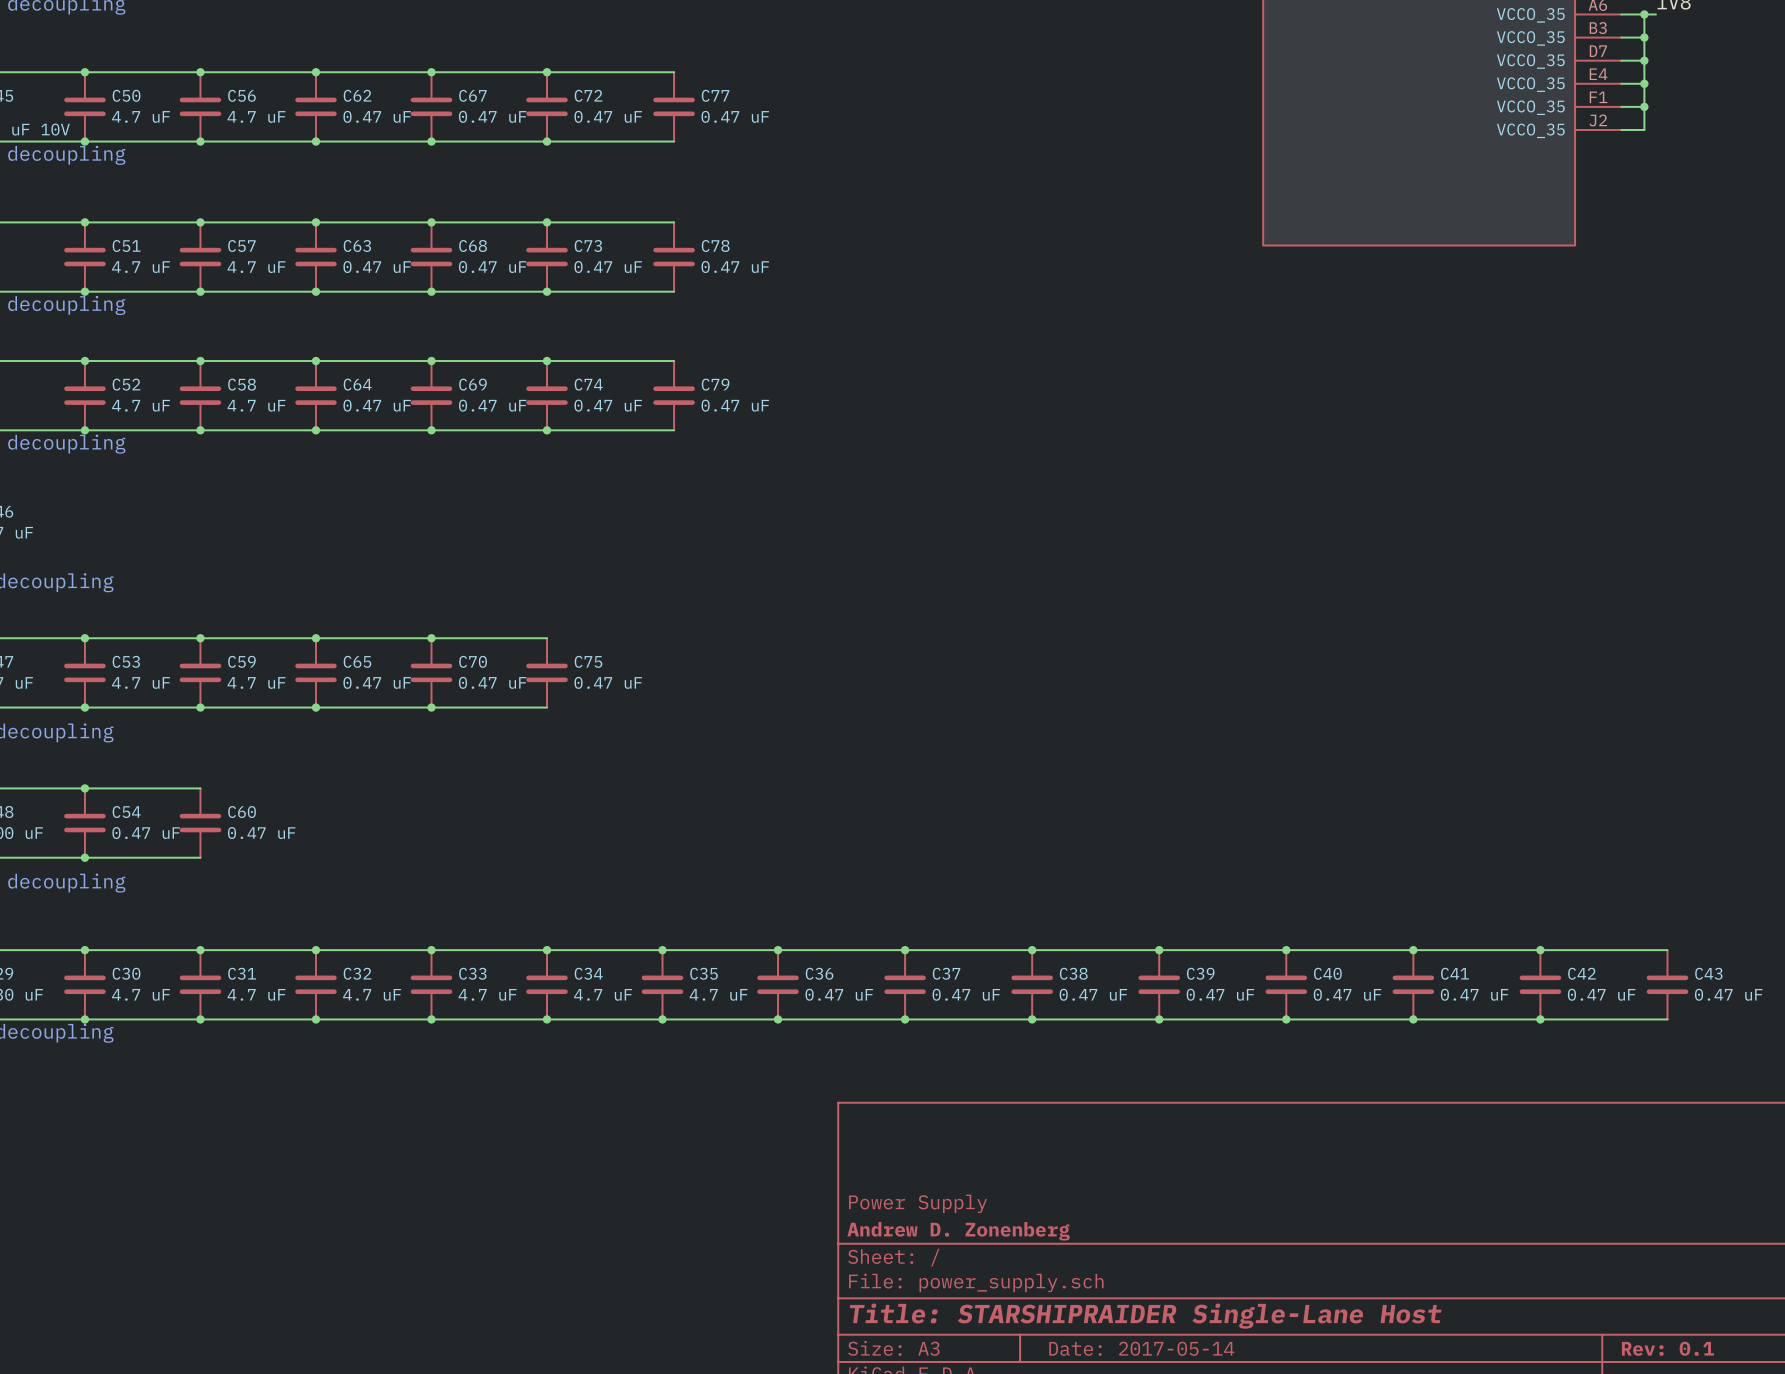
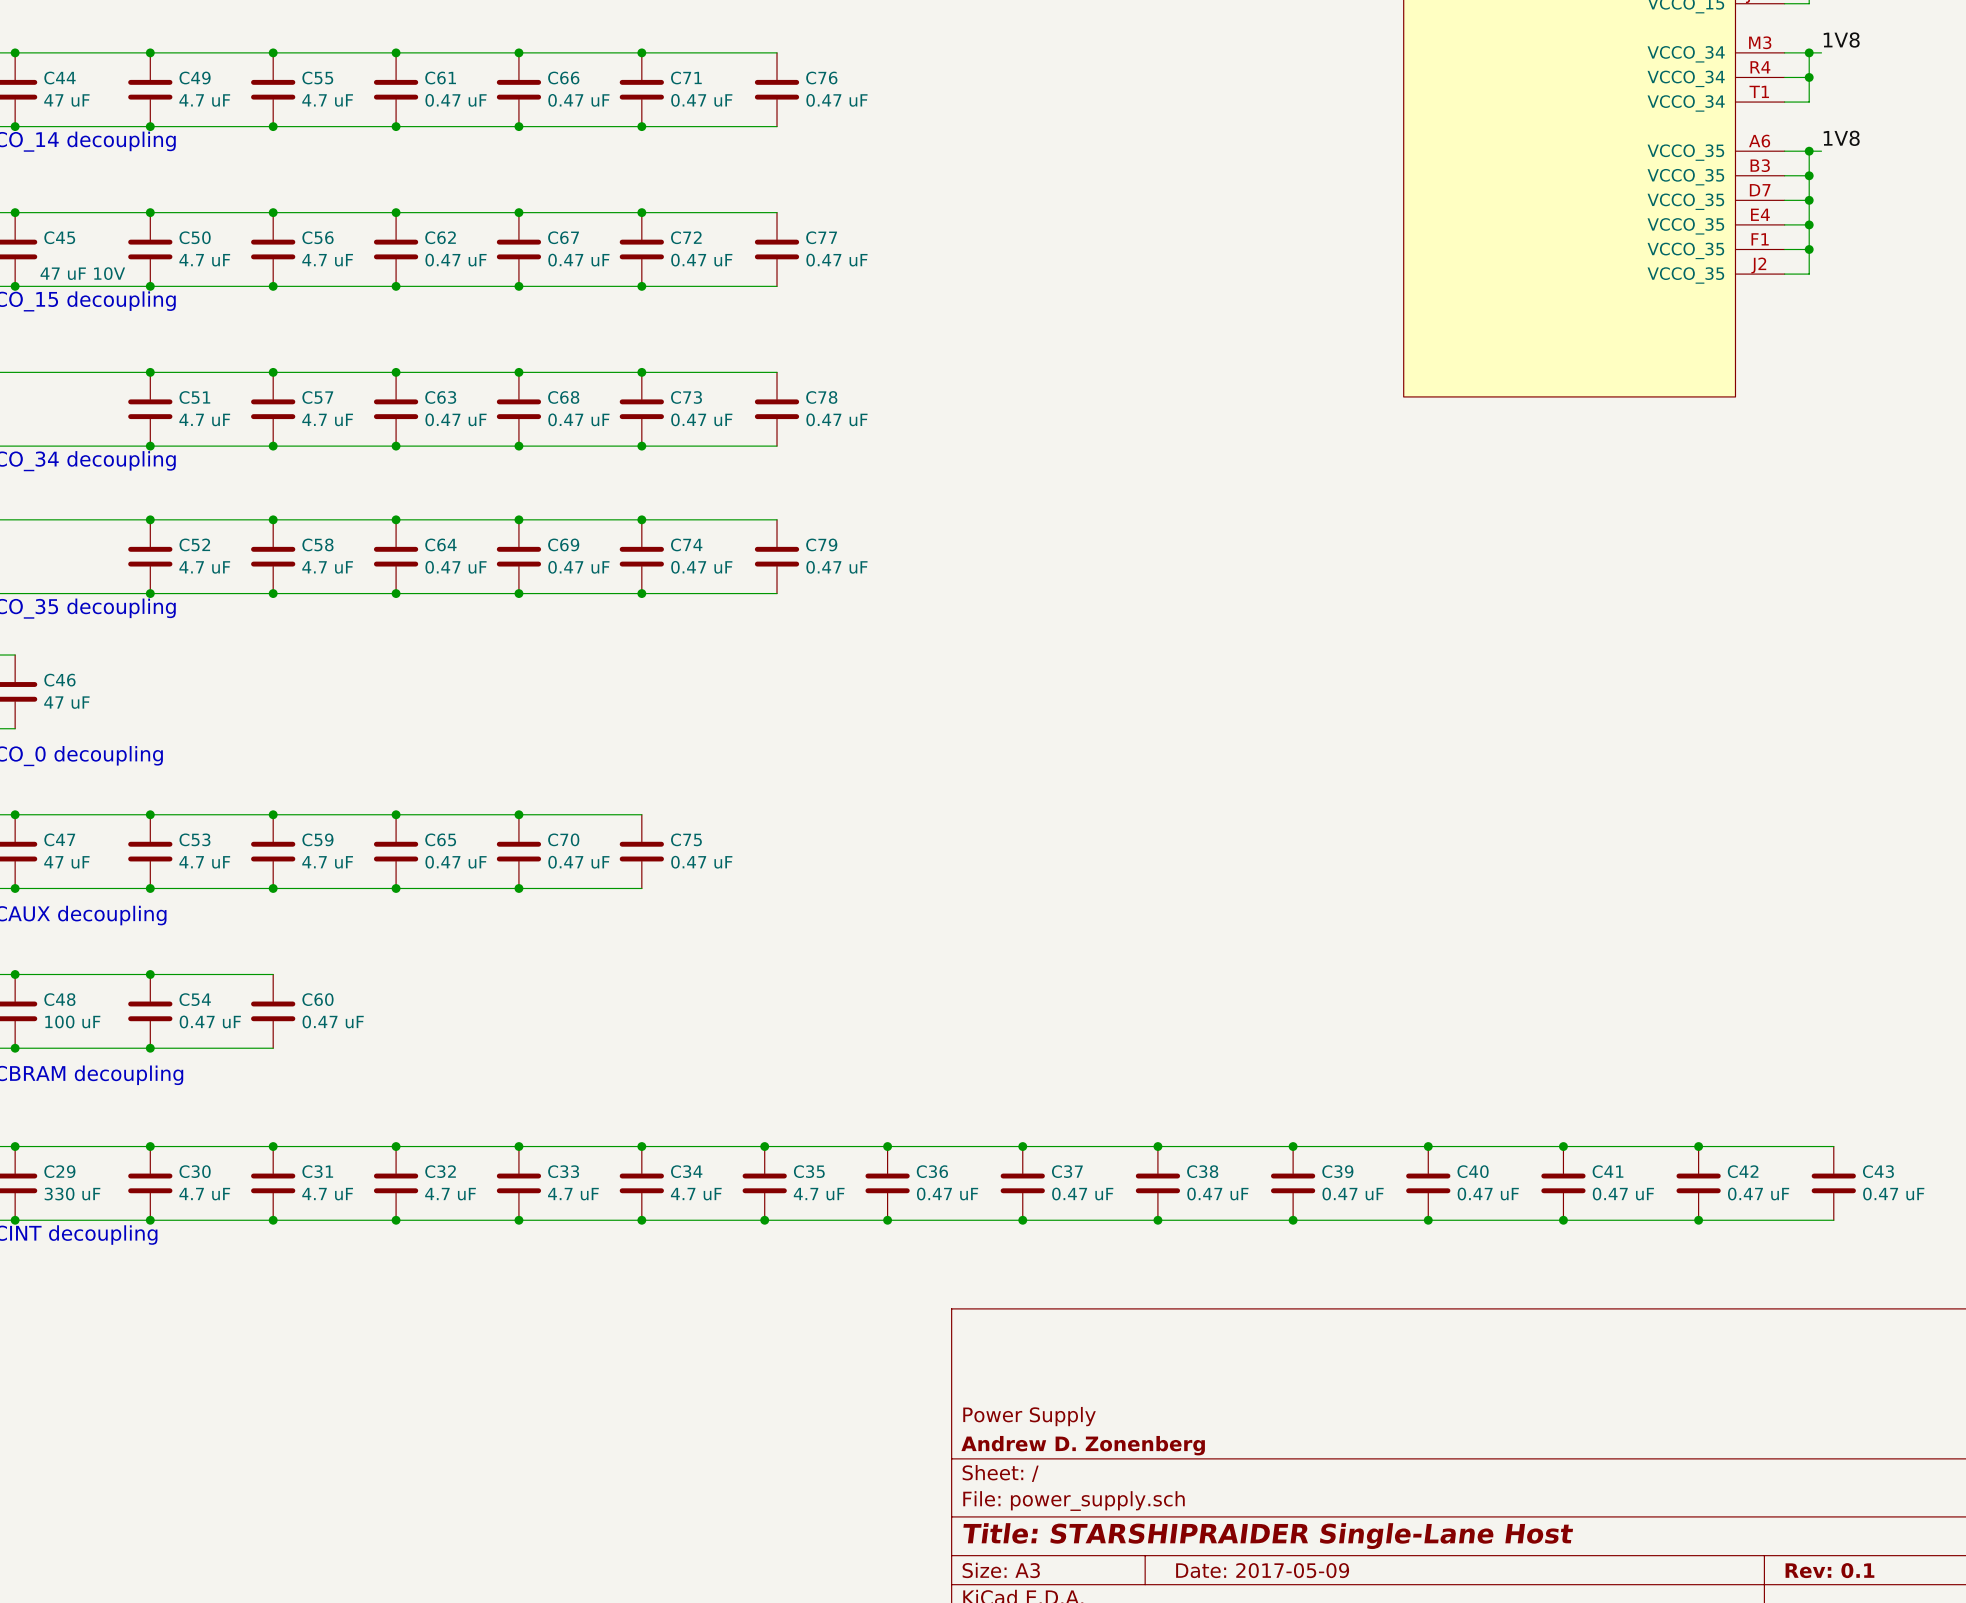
title block: Date: 2017-05-14 (1141, 1348) -> Date: 2017-05-09 (1262, 1570)

